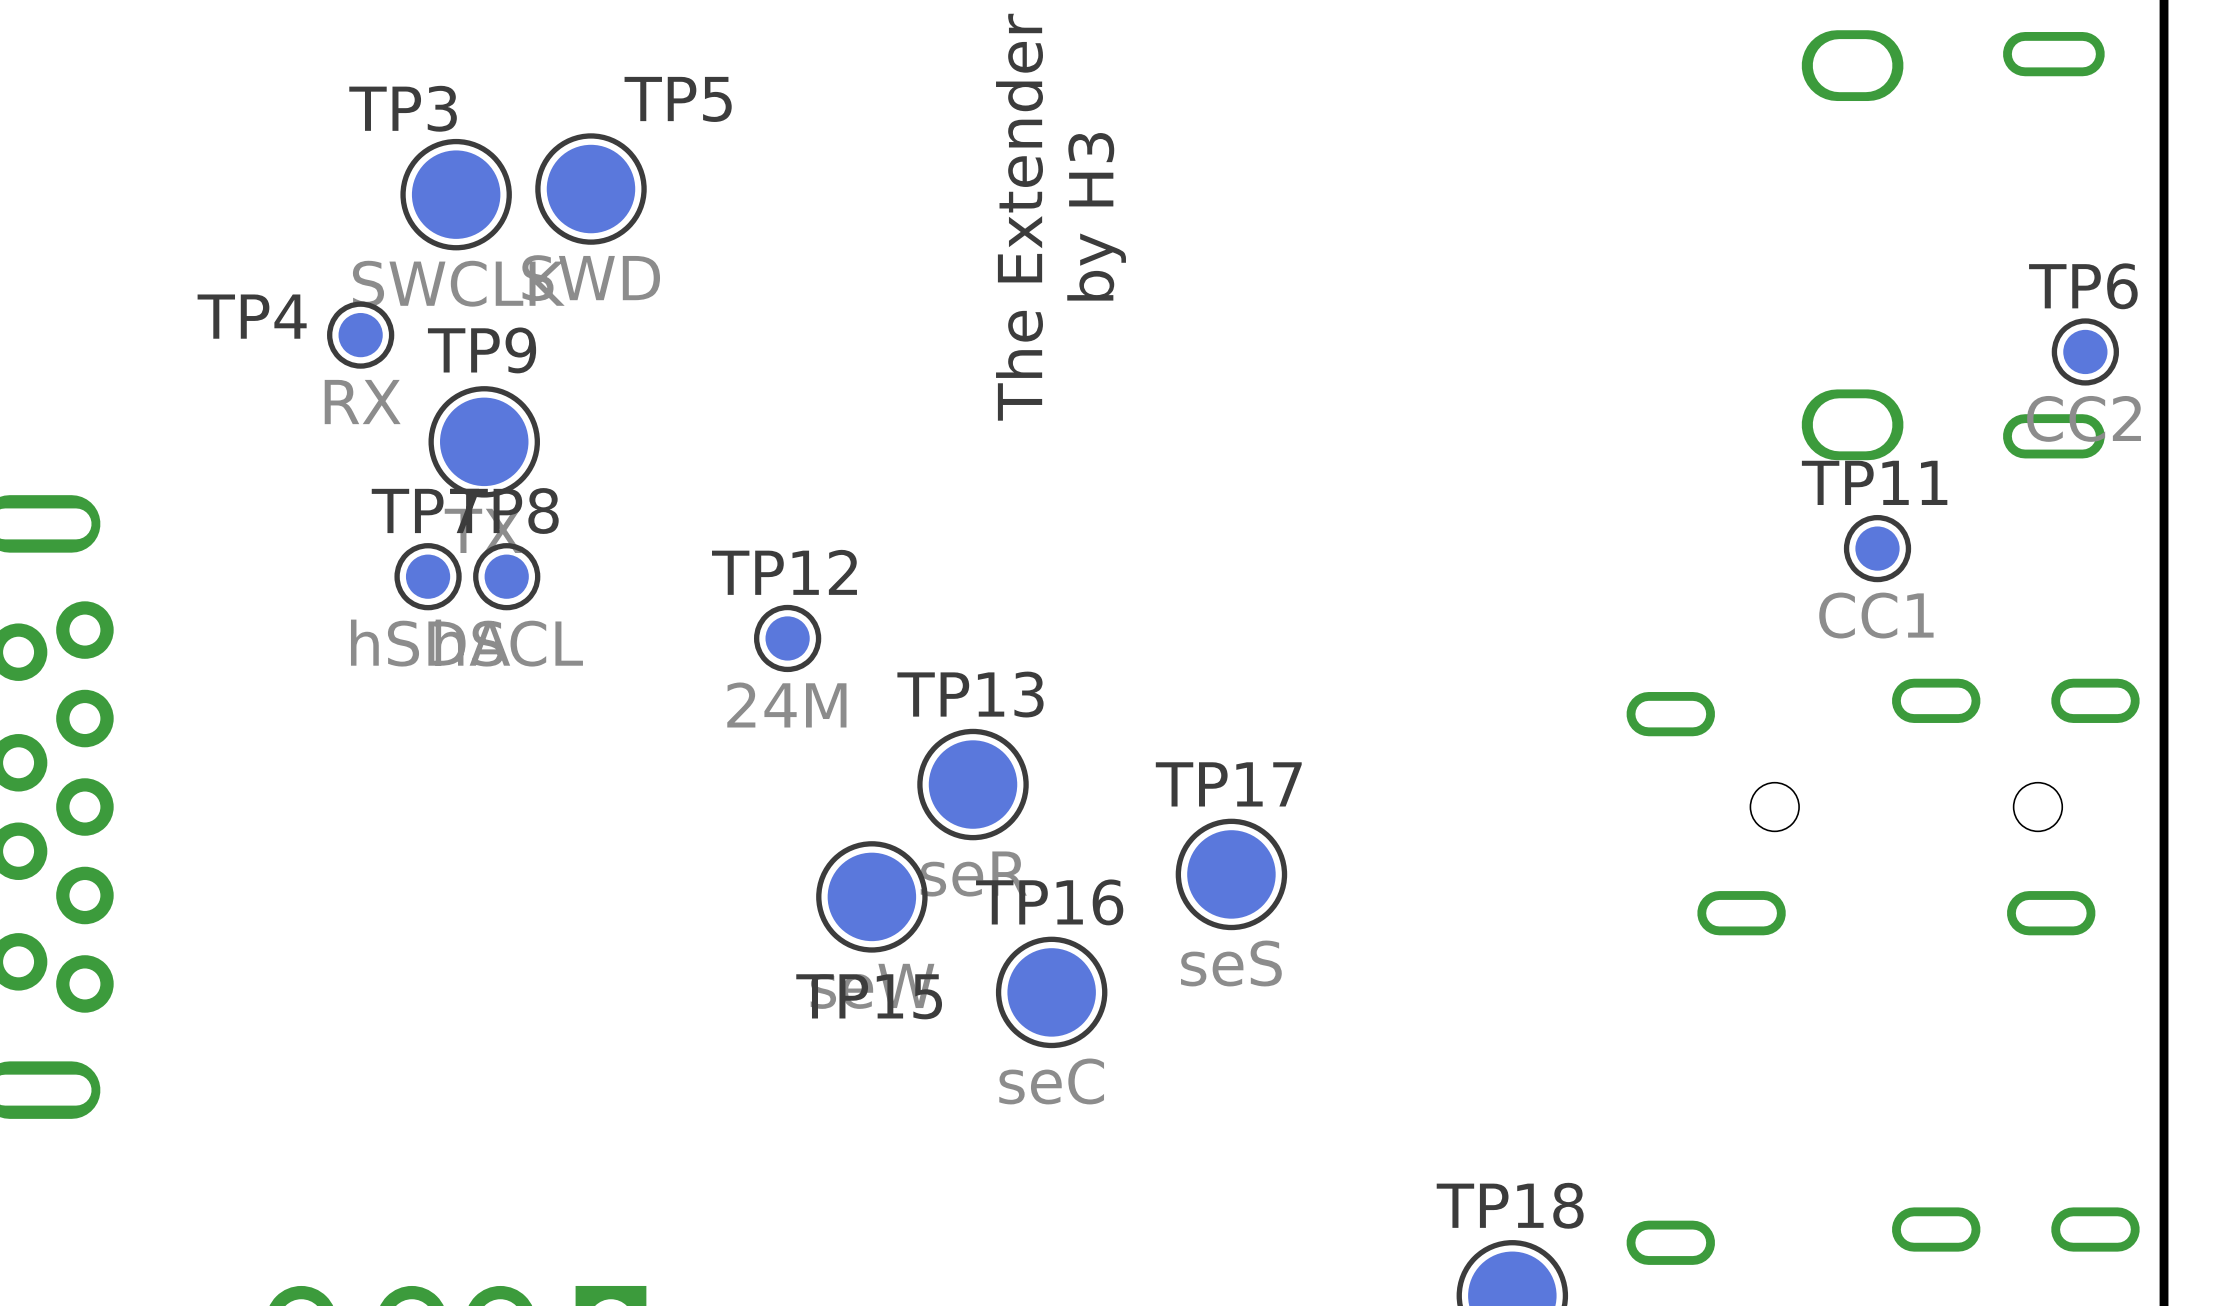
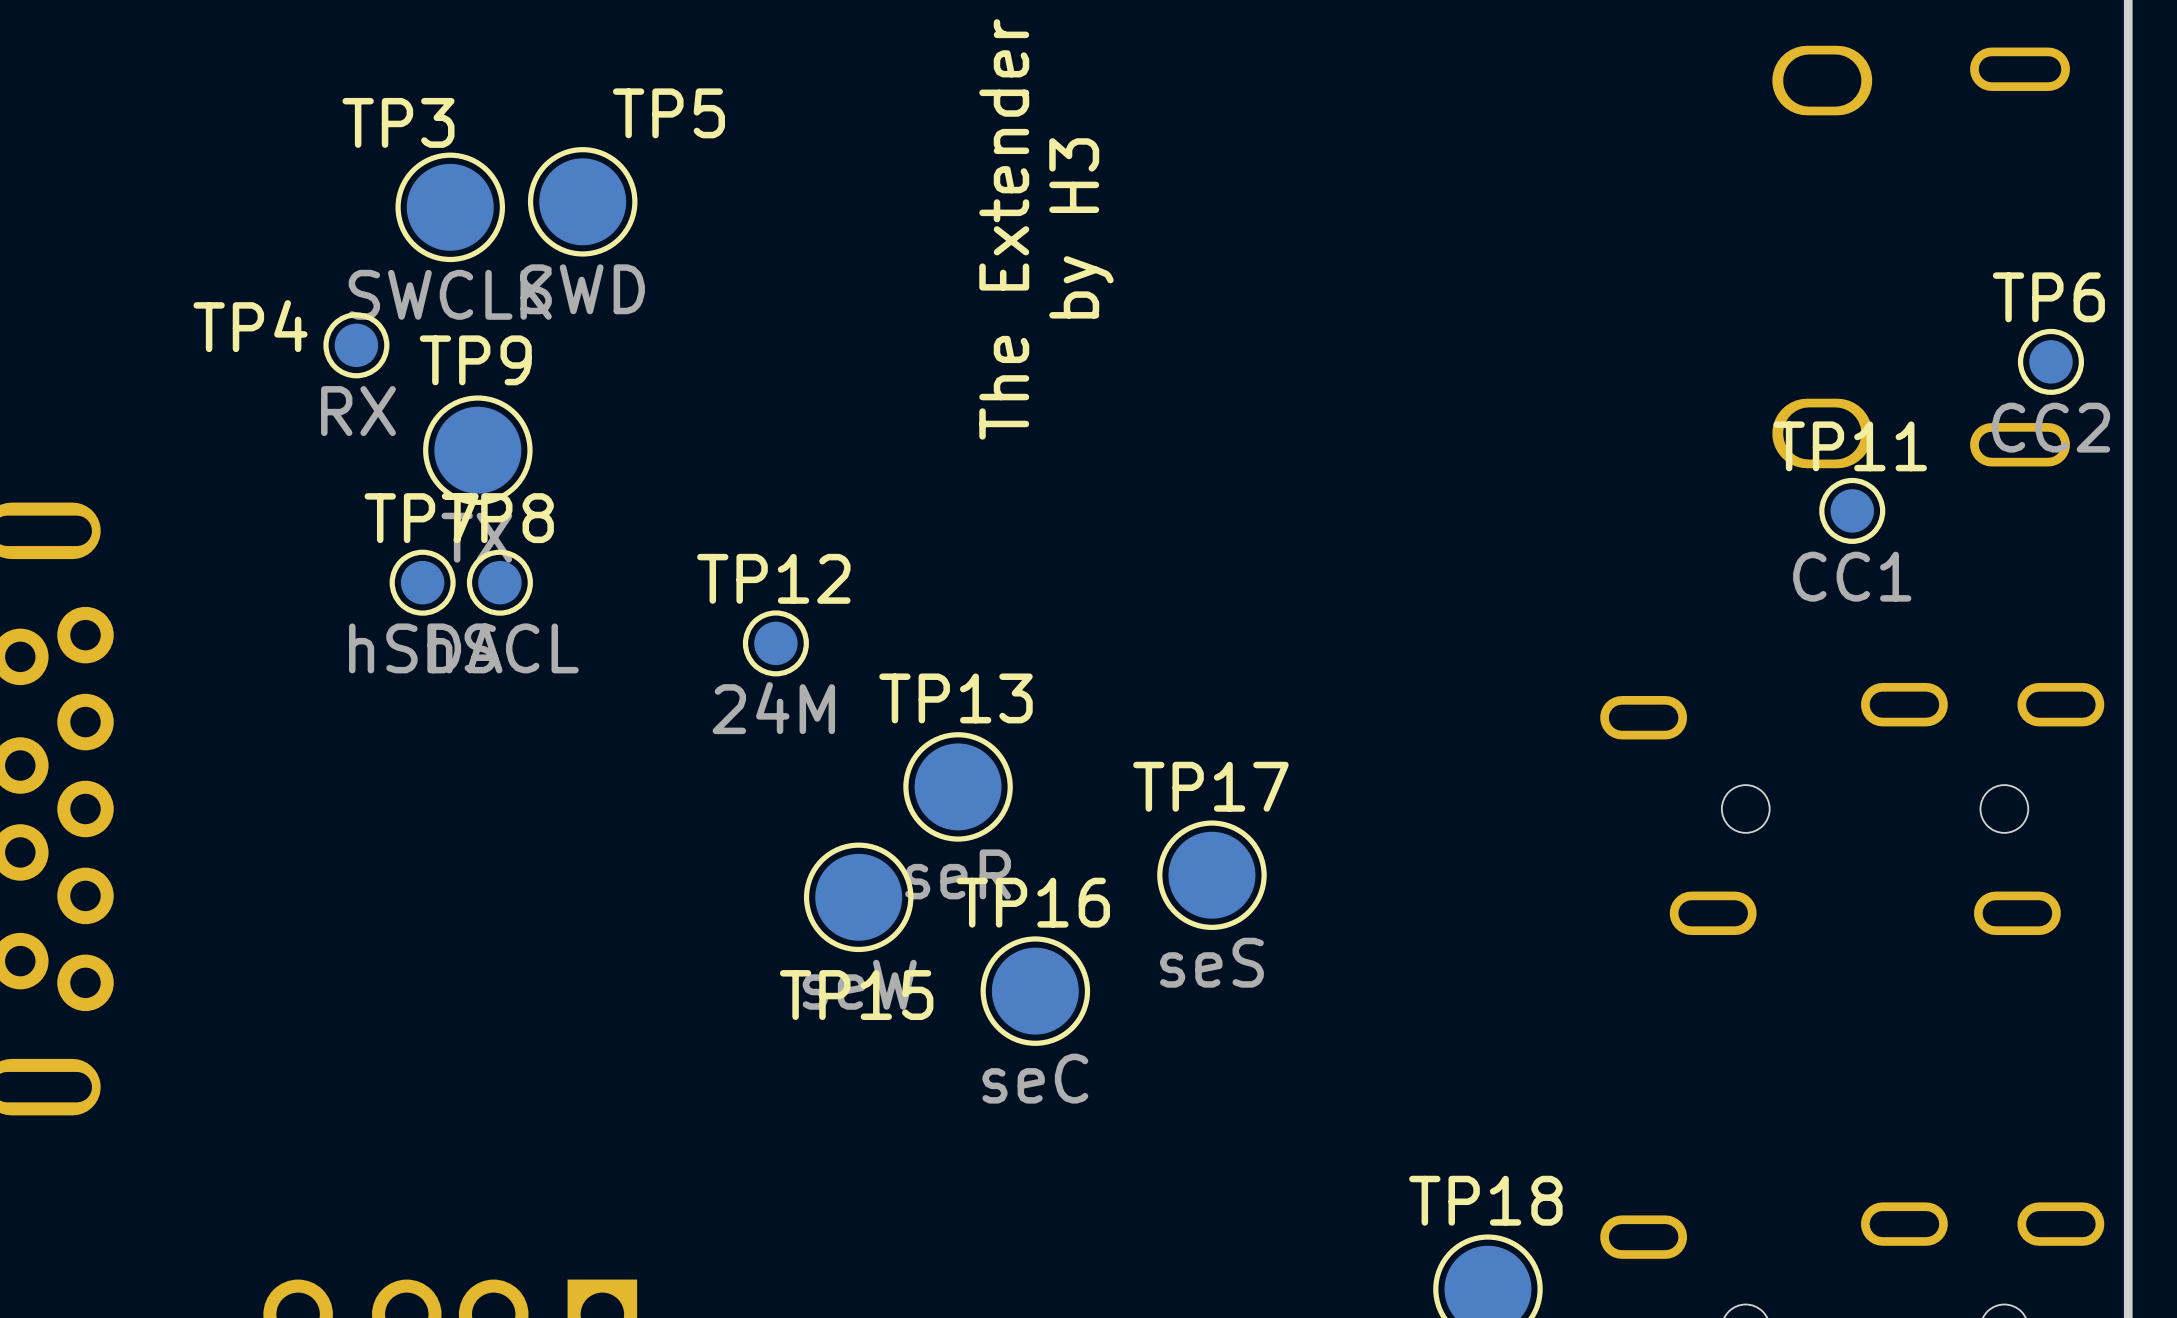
TP11 position: (1877, 548) -> (1852, 510)

